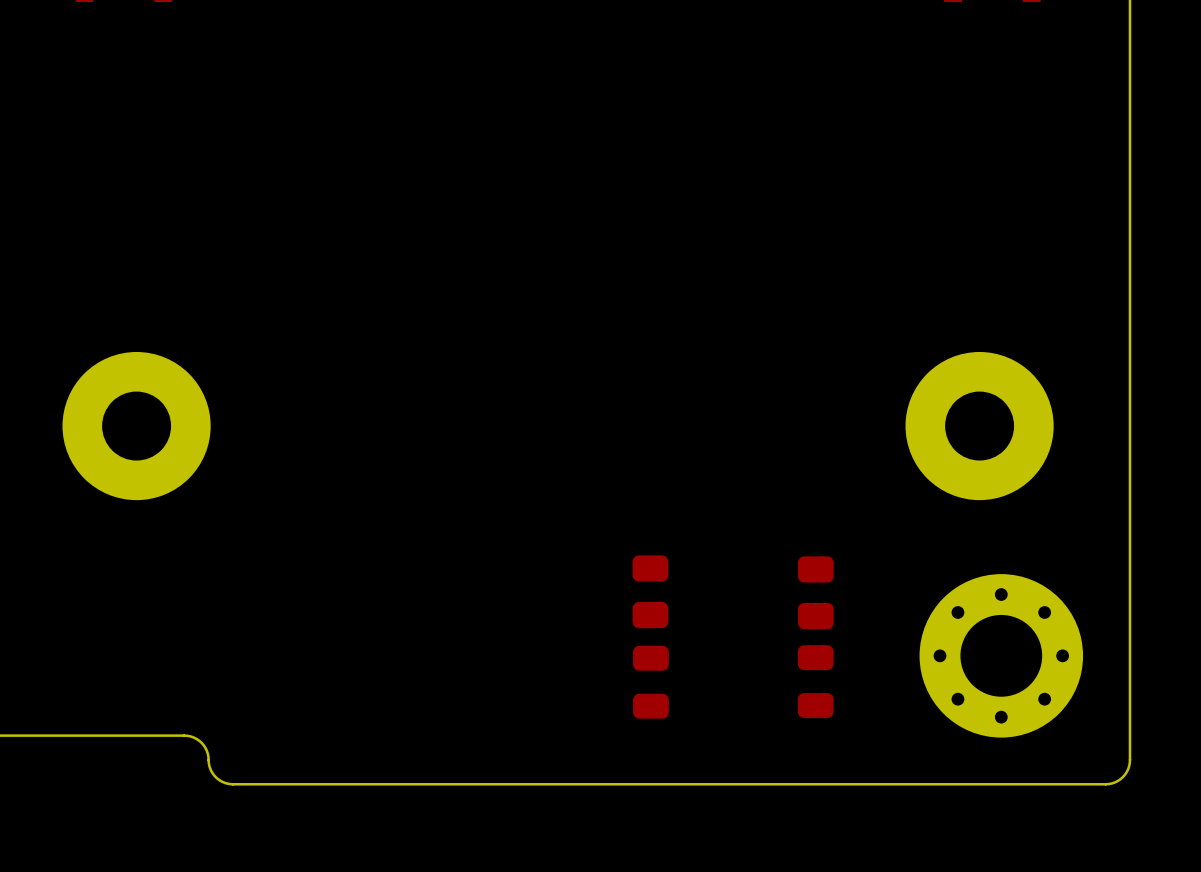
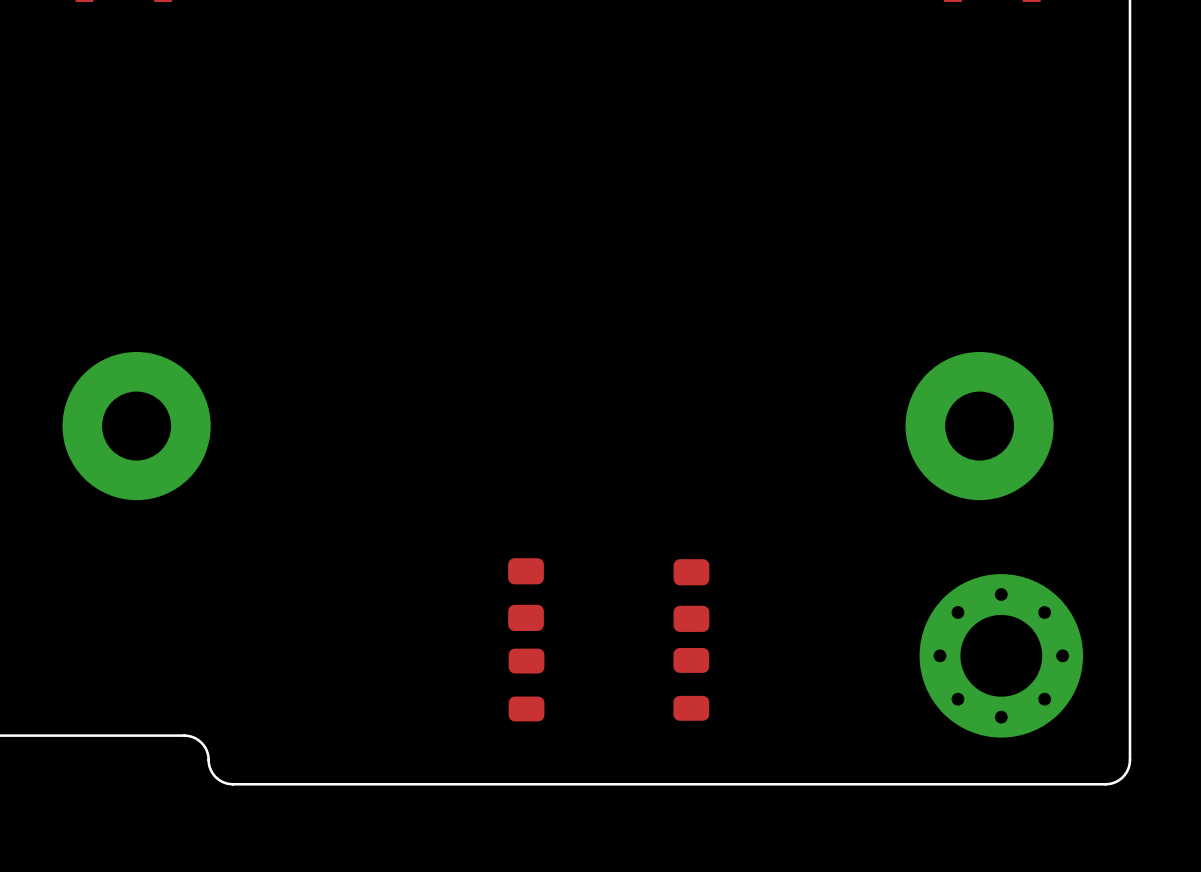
part position: (650, 591) -> (691, 595)
part: (815, 592) -> none
part: none -> (526, 594)
part: (815, 681) -> none
part position: (650, 682) -> (691, 684)
part: none -> (526, 685)

